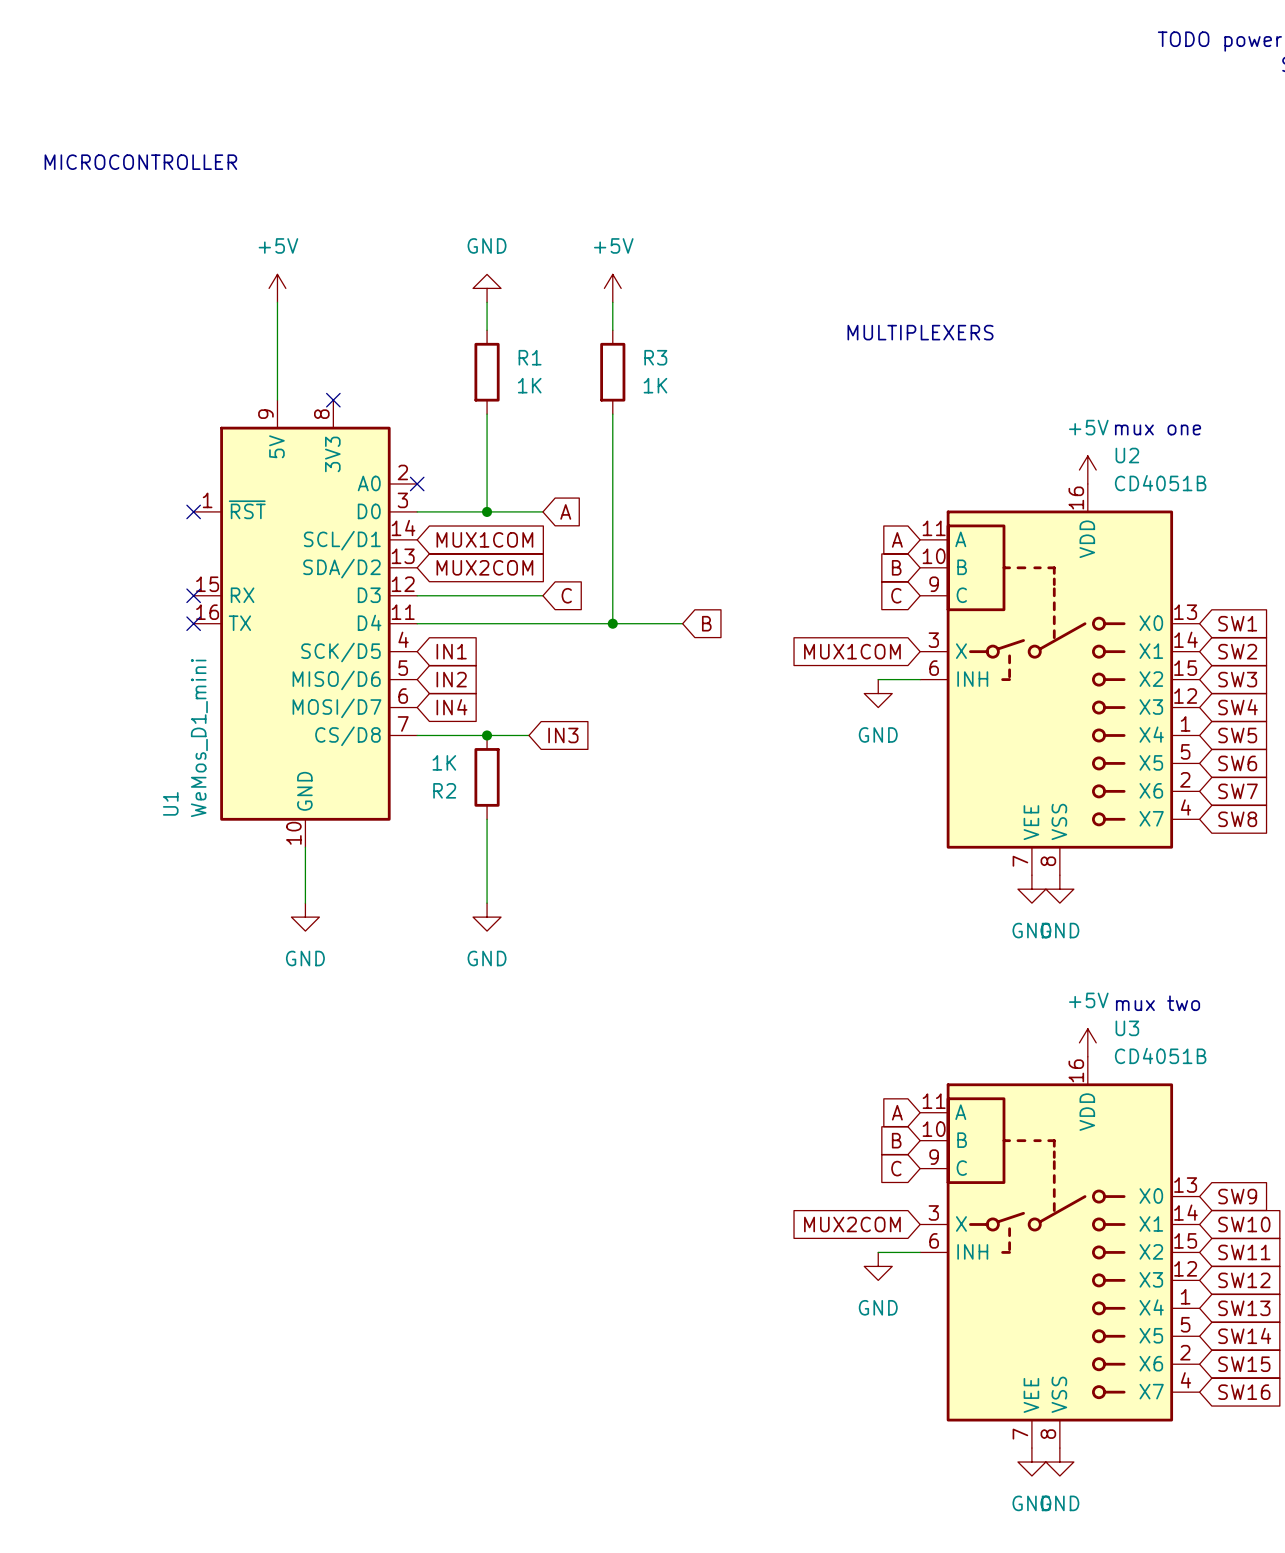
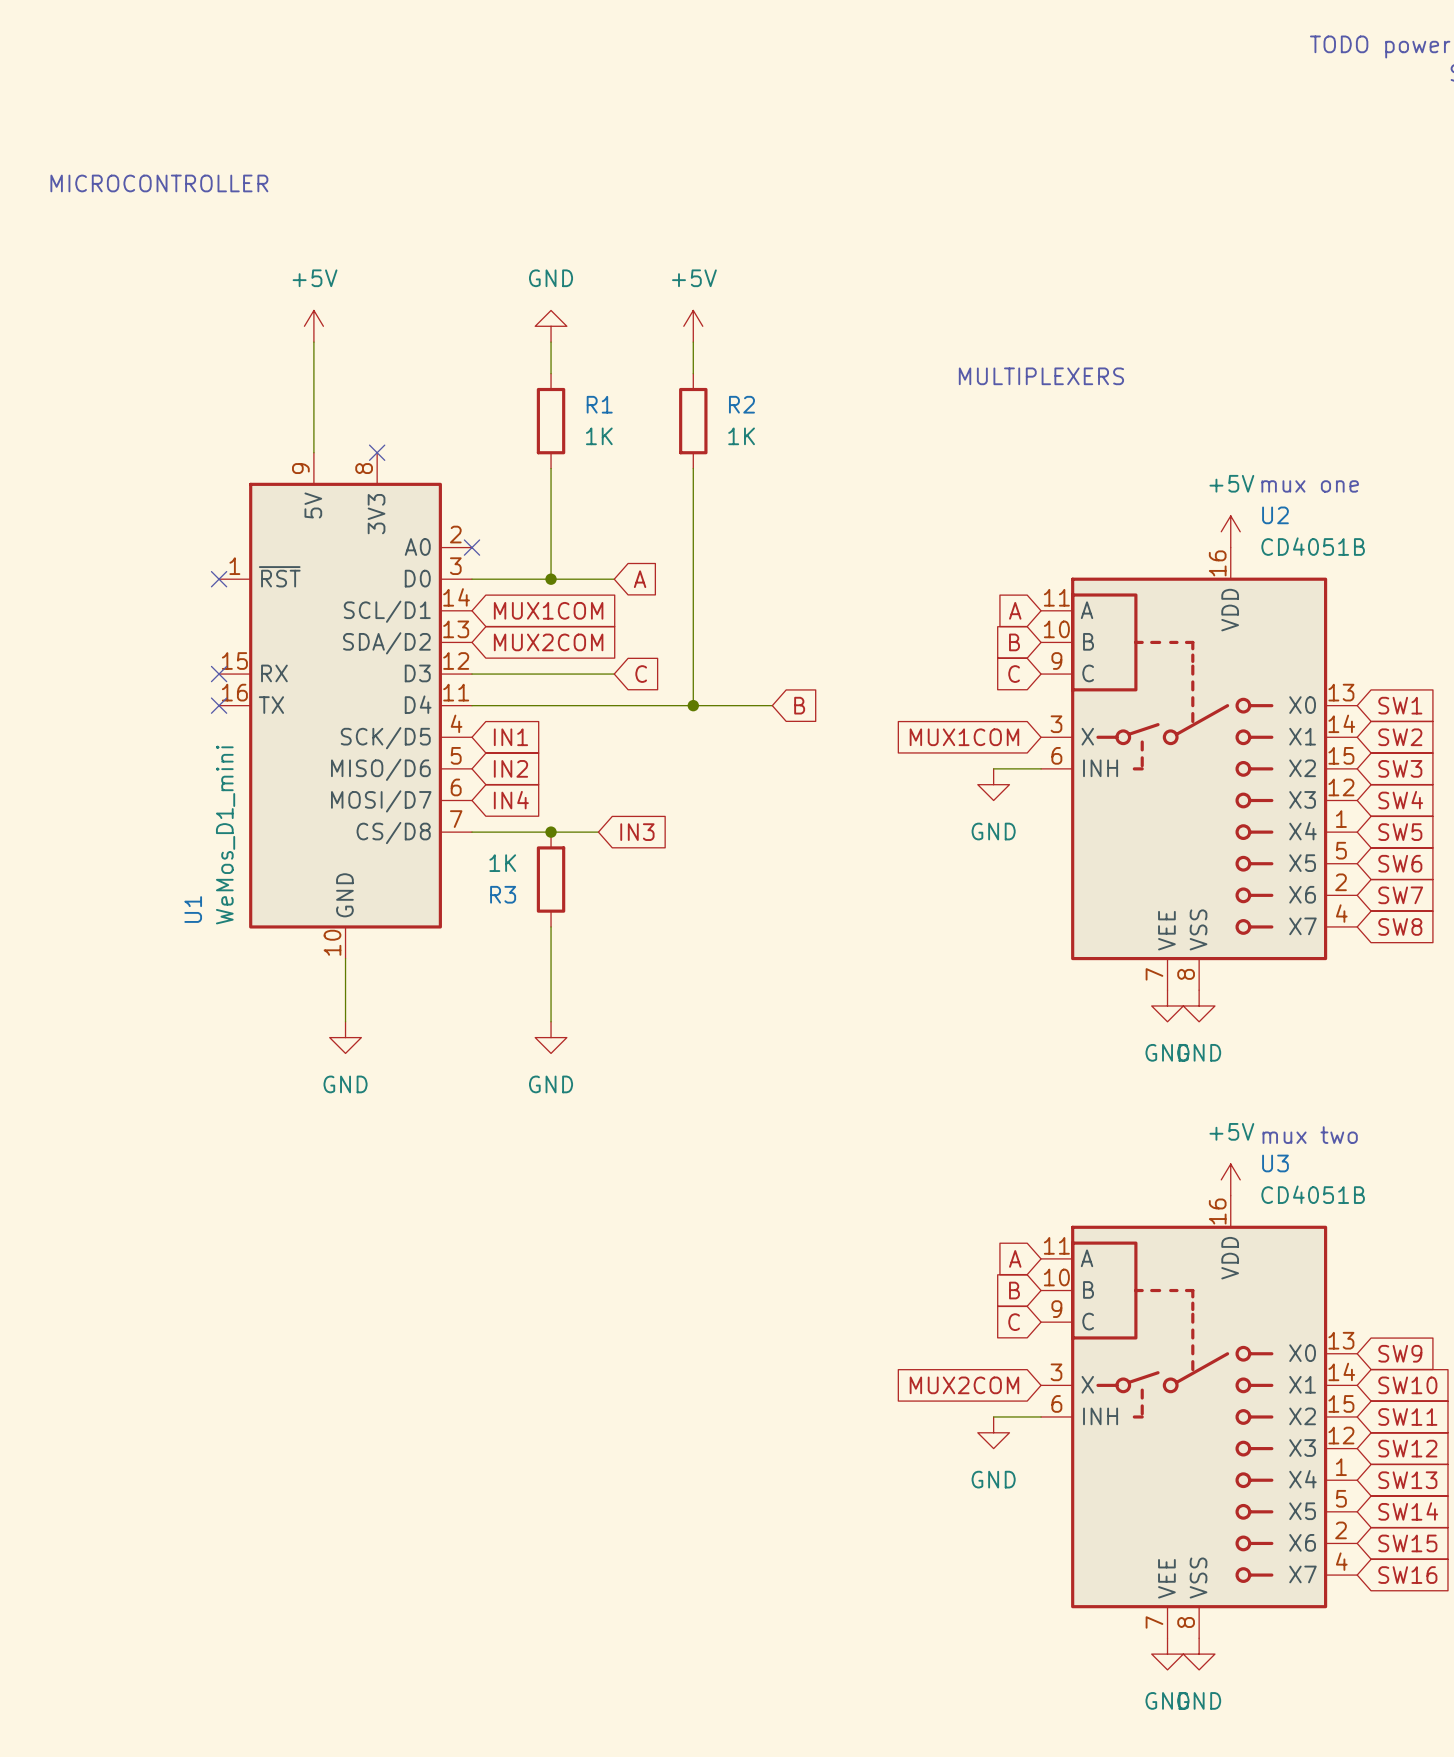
R3 name: R3 (655, 357) -> R2 (741, 404)
R2 name: R2 (444, 790) -> R3 (503, 894)

